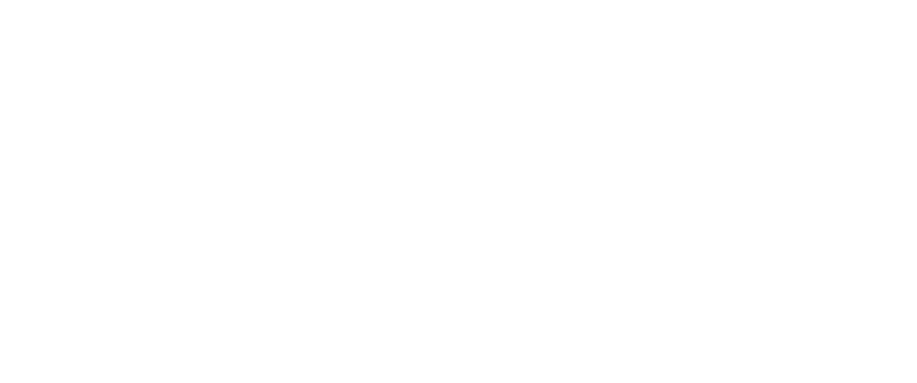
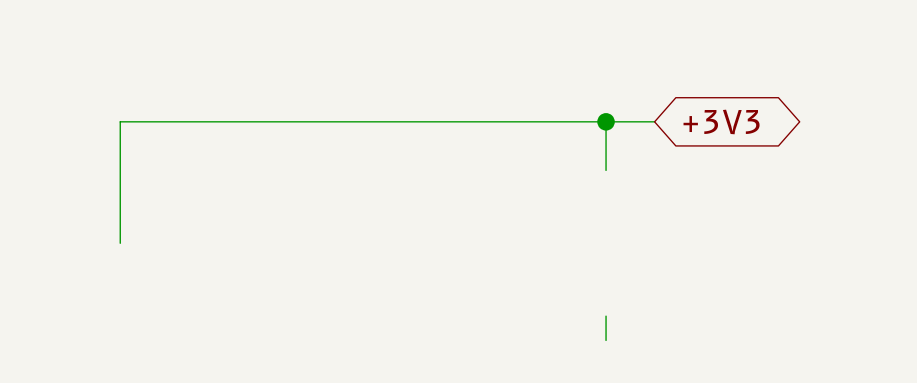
wire: none -> (606, 121) (606, 170)
junction: none -> (606, 121)
wire: none -> (654, 121) (120, 121) (120, 243)
global label: none -> +3V3 (721, 121)
wire: none -> (606, 316) (606, 340)

